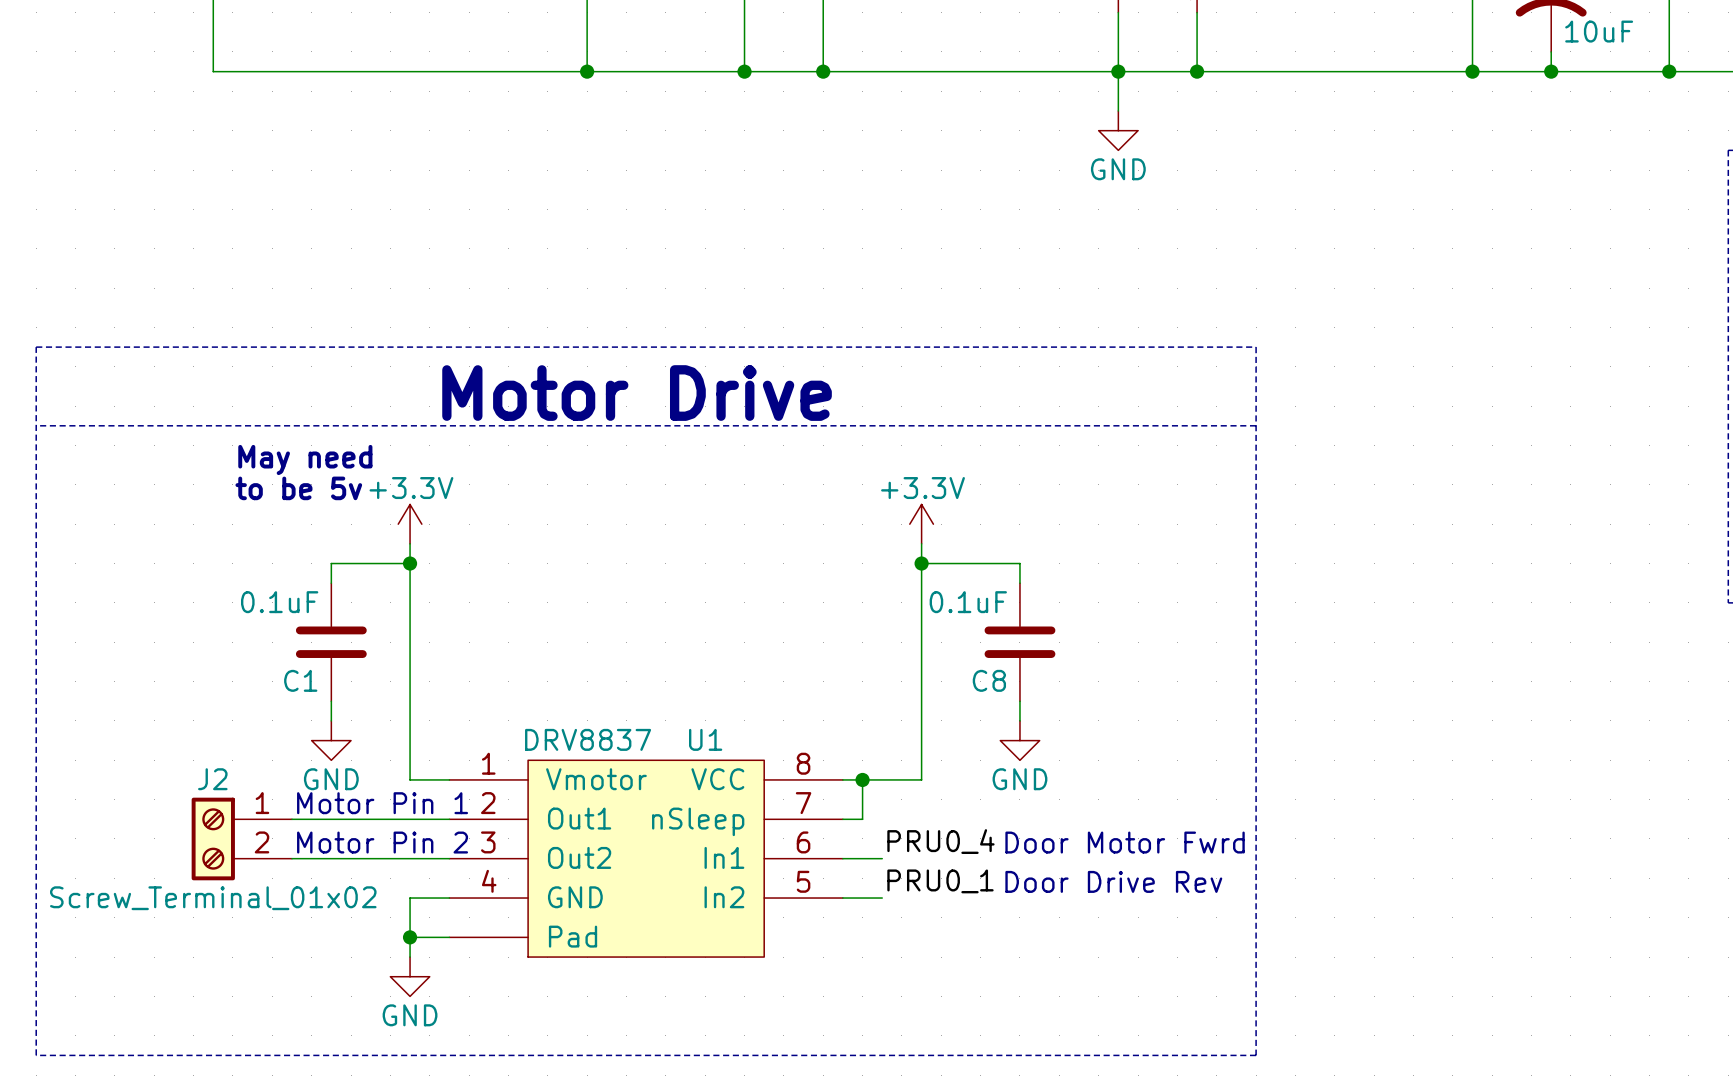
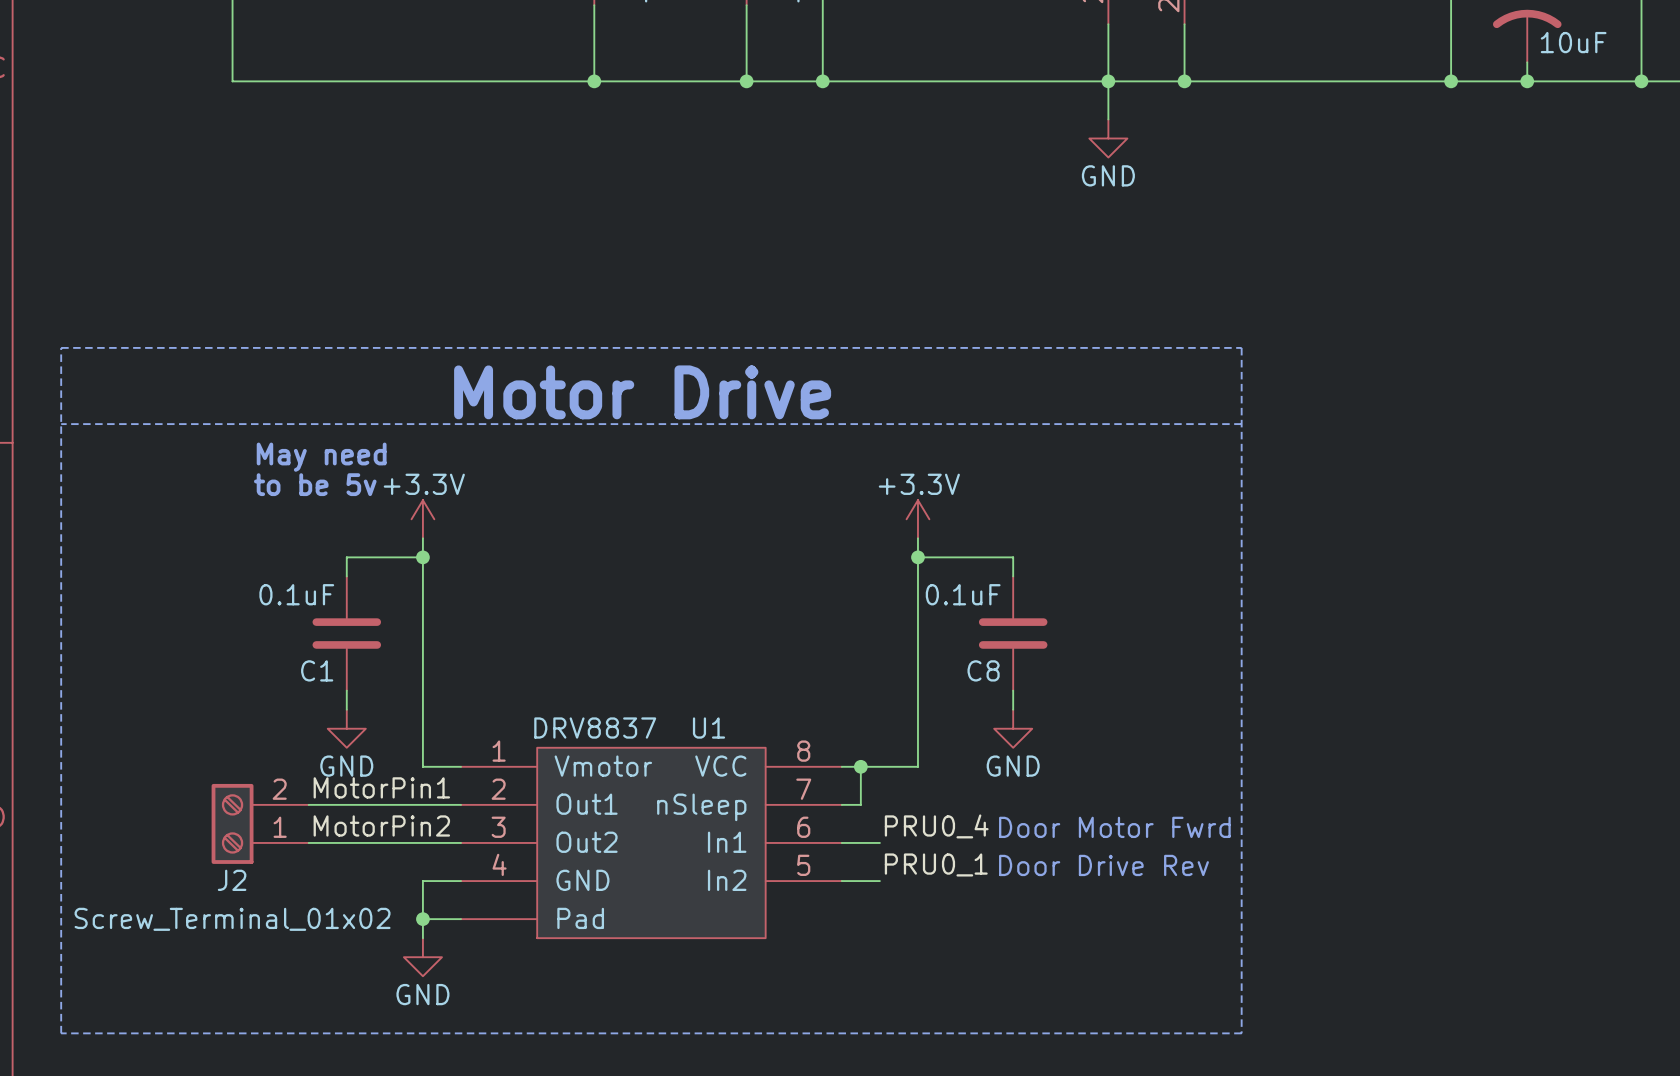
label: none -> MotorPin1 (381, 787)
text: Motor Pin 1 (382, 803) -> none
J2 flip: as is (213, 838) -> up-down (232, 823)
label: none -> MotorPin2 (381, 825)
text: Motor Pin 2 (382, 842) -> none
J2 value position: Screw_Terminal_01x02 (213, 898) -> Screw_Terminal_01x02 (232, 919)

